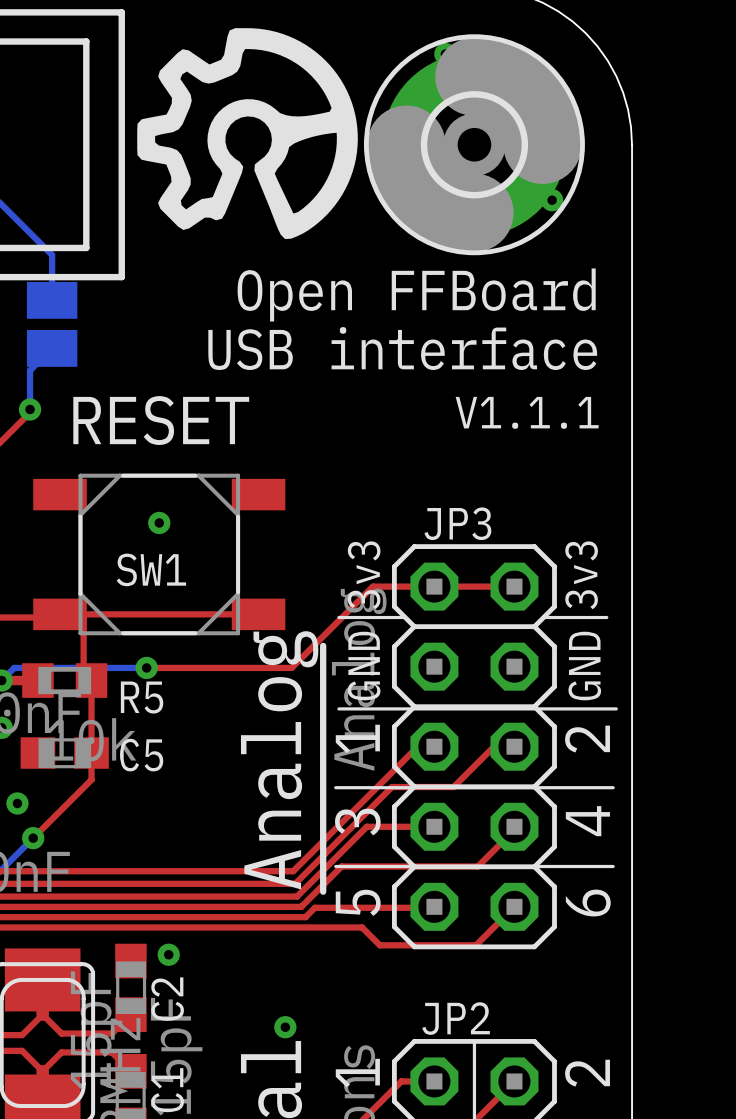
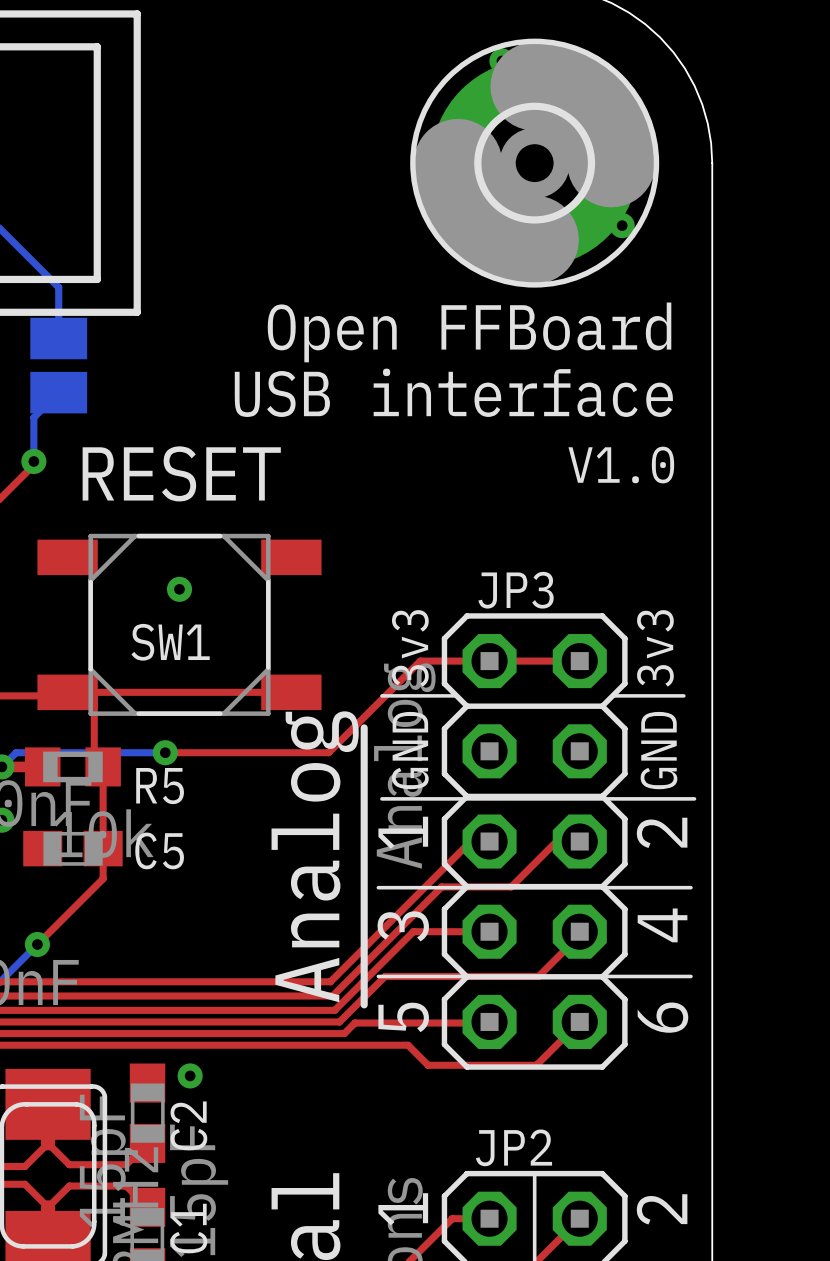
drawing: [137, 28, 358, 240] -> none
text: V1.1.1 (527, 412) -> V1.0 (621, 465)
via: (17, 803) -> none
via: (285, 1027) -> none

